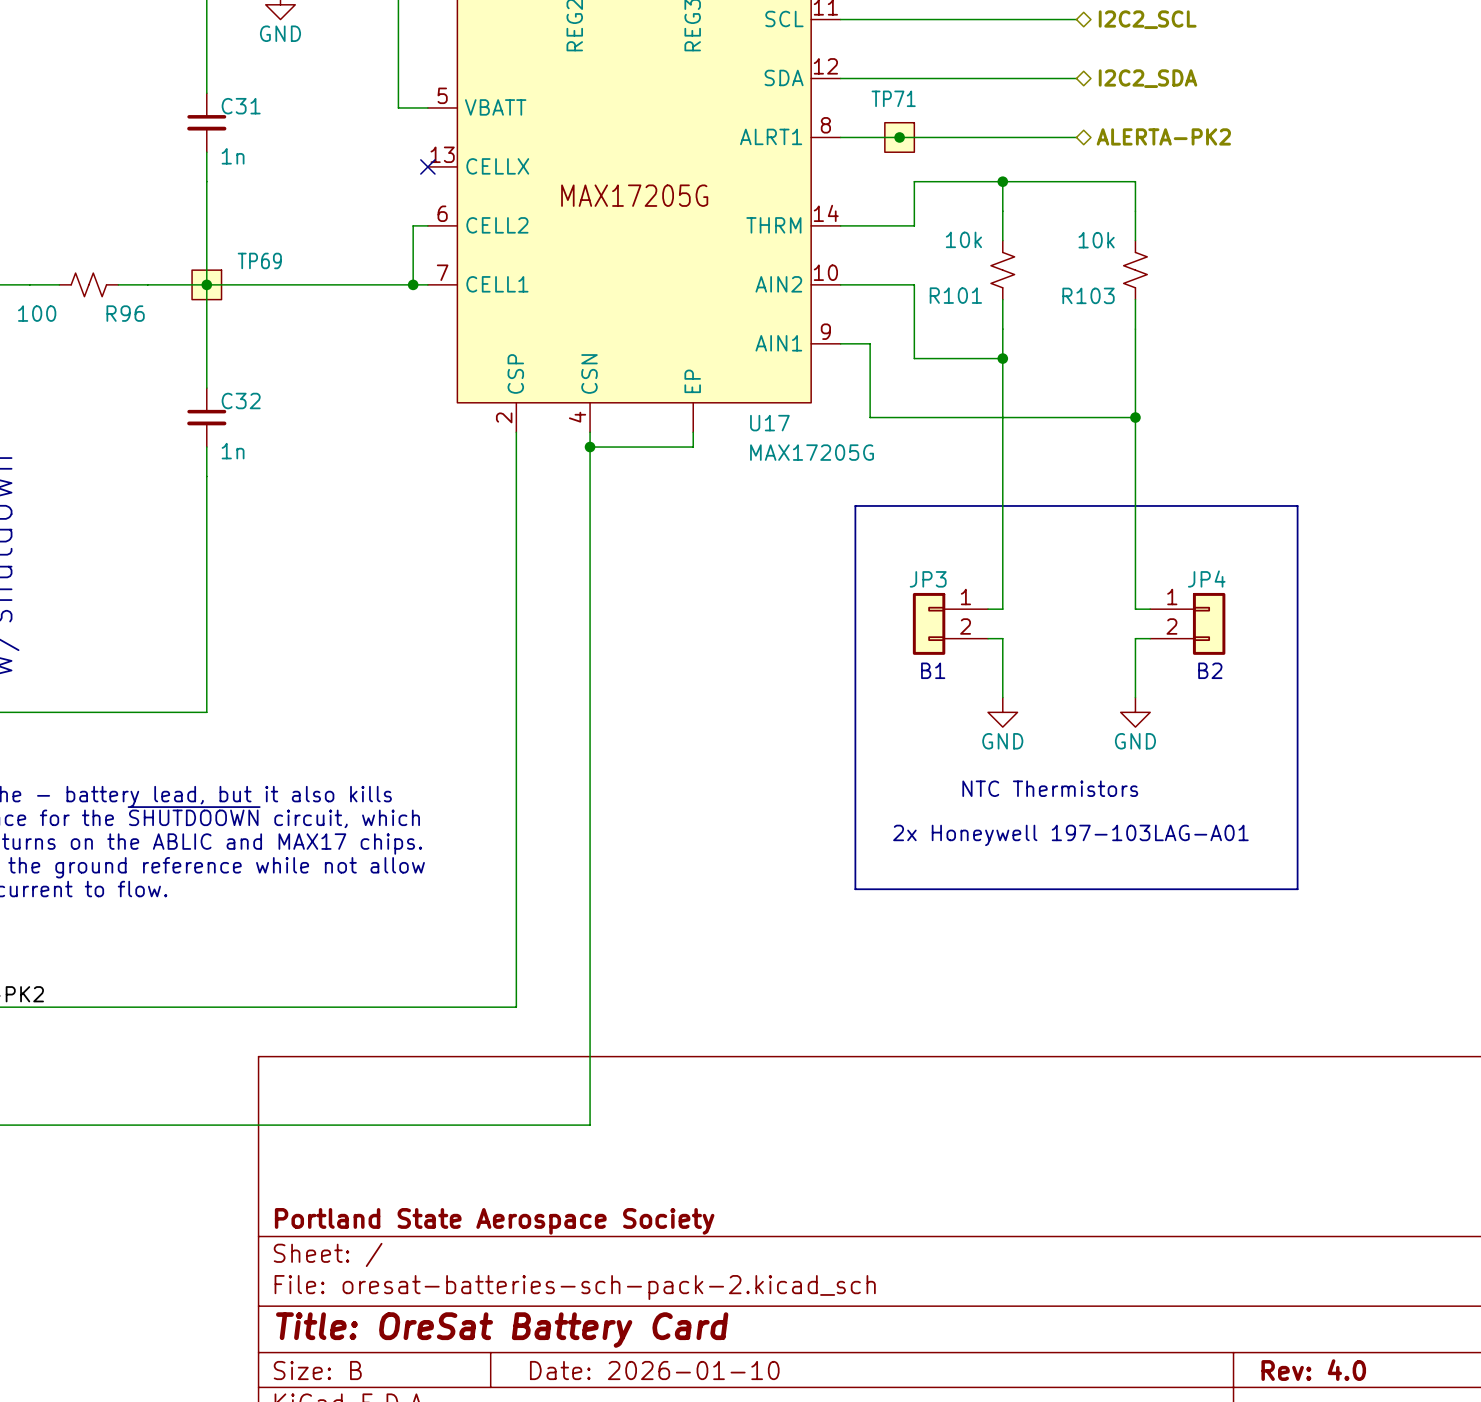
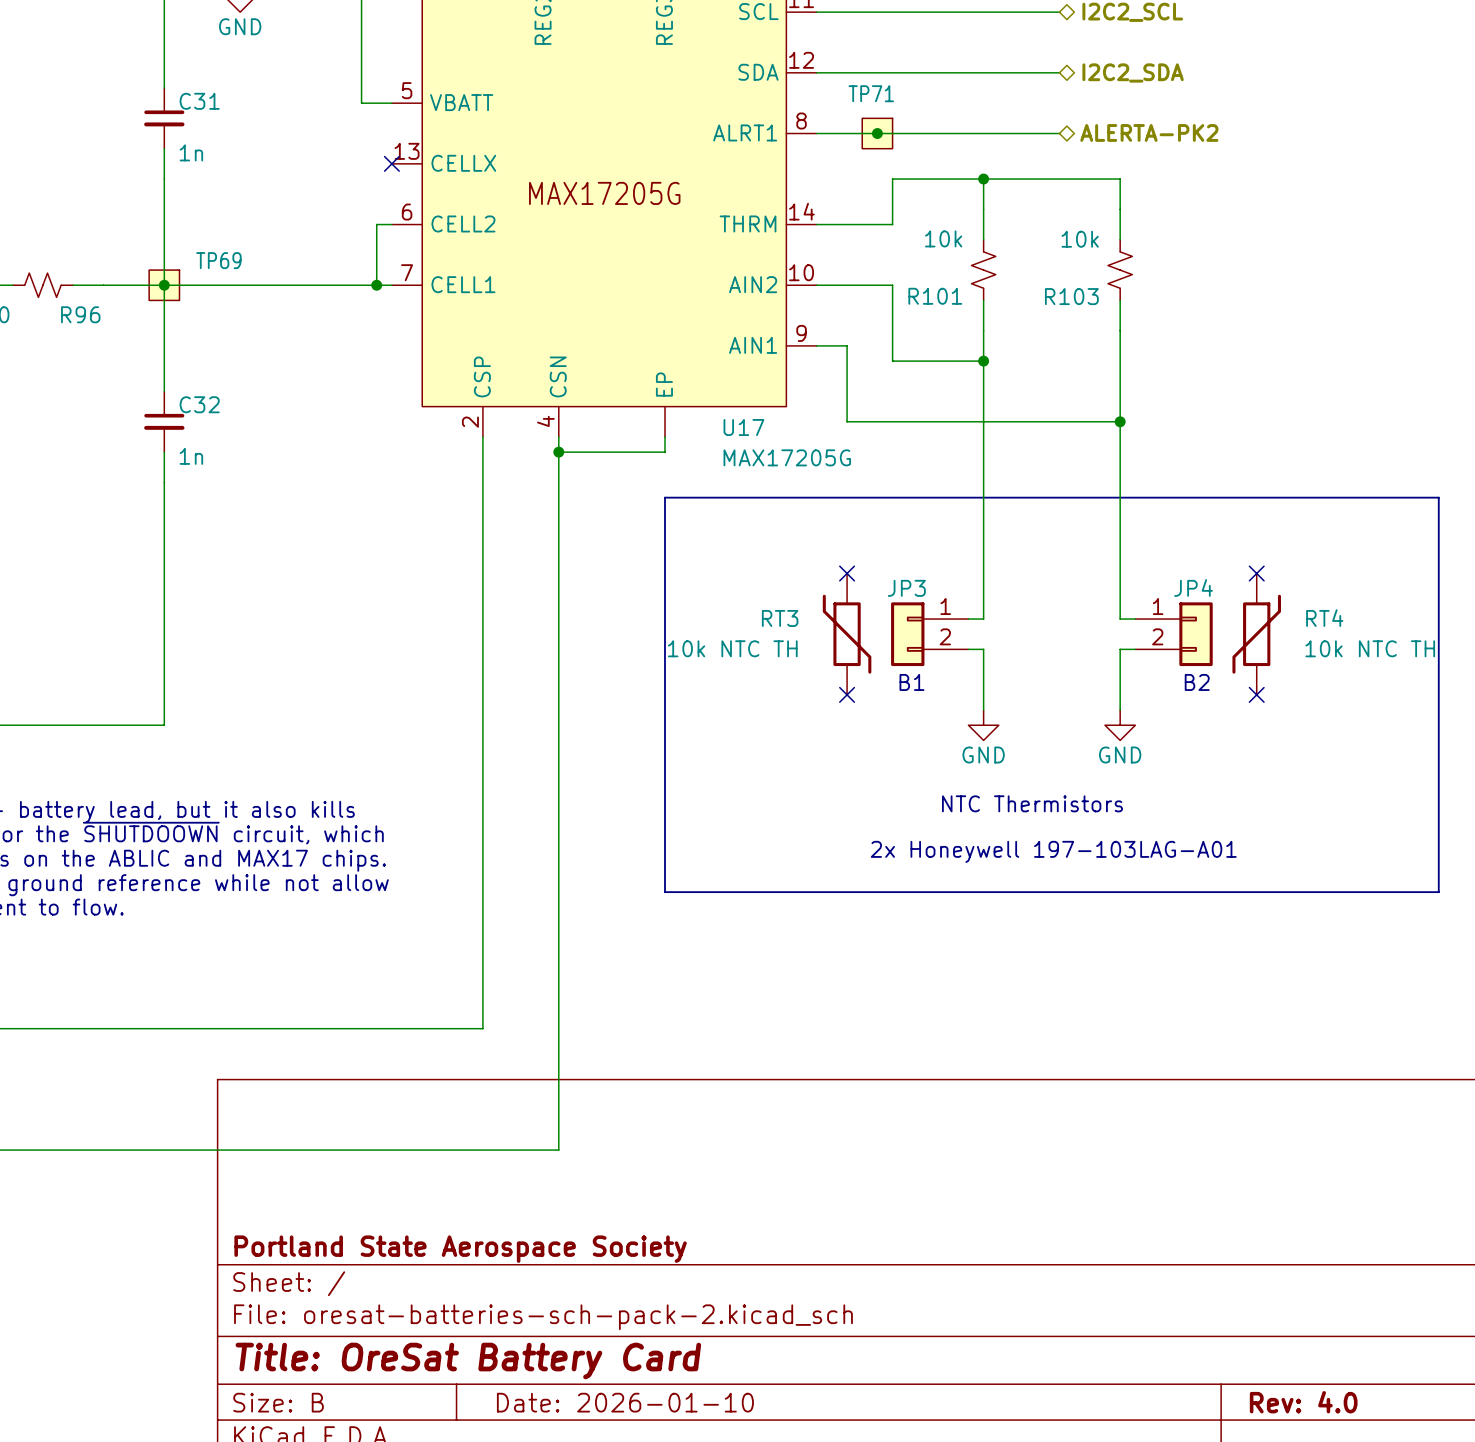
line: (855, 505) (1297, 505) (1297, 889) (855, 889) (855, 505) -> (665, 497) (665, 892) (1438, 892) (1438, 497) (665, 497)
no-connect mark: none -> (847, 573)
no-connect mark: none -> (1256, 573)
RT3: none -> 10k NTC TH (847, 634)
RT4: none -> 10k NTC TH (1256, 634)
no-connect mark: none -> (847, 694)
no-connect mark: none -> (1256, 694)

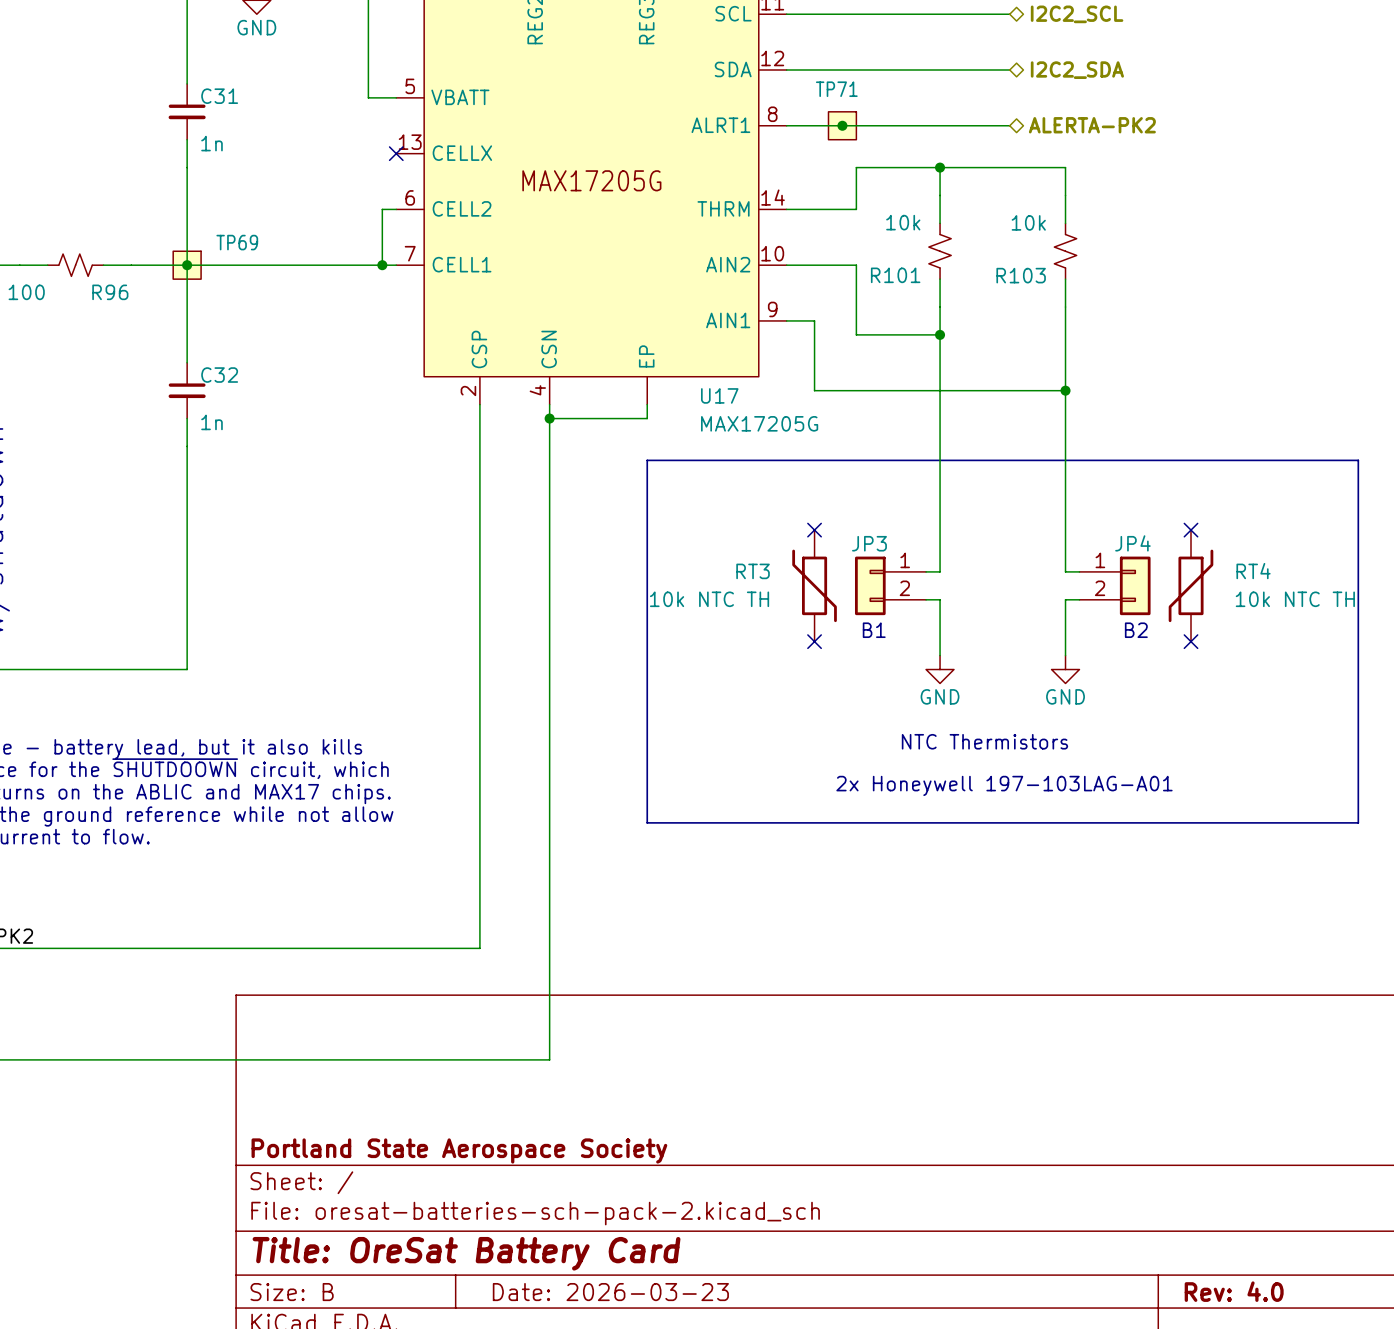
title block: Date: 2026-01-10 (625, 1402) -> Date: 2026-03-23 (610, 1292)

